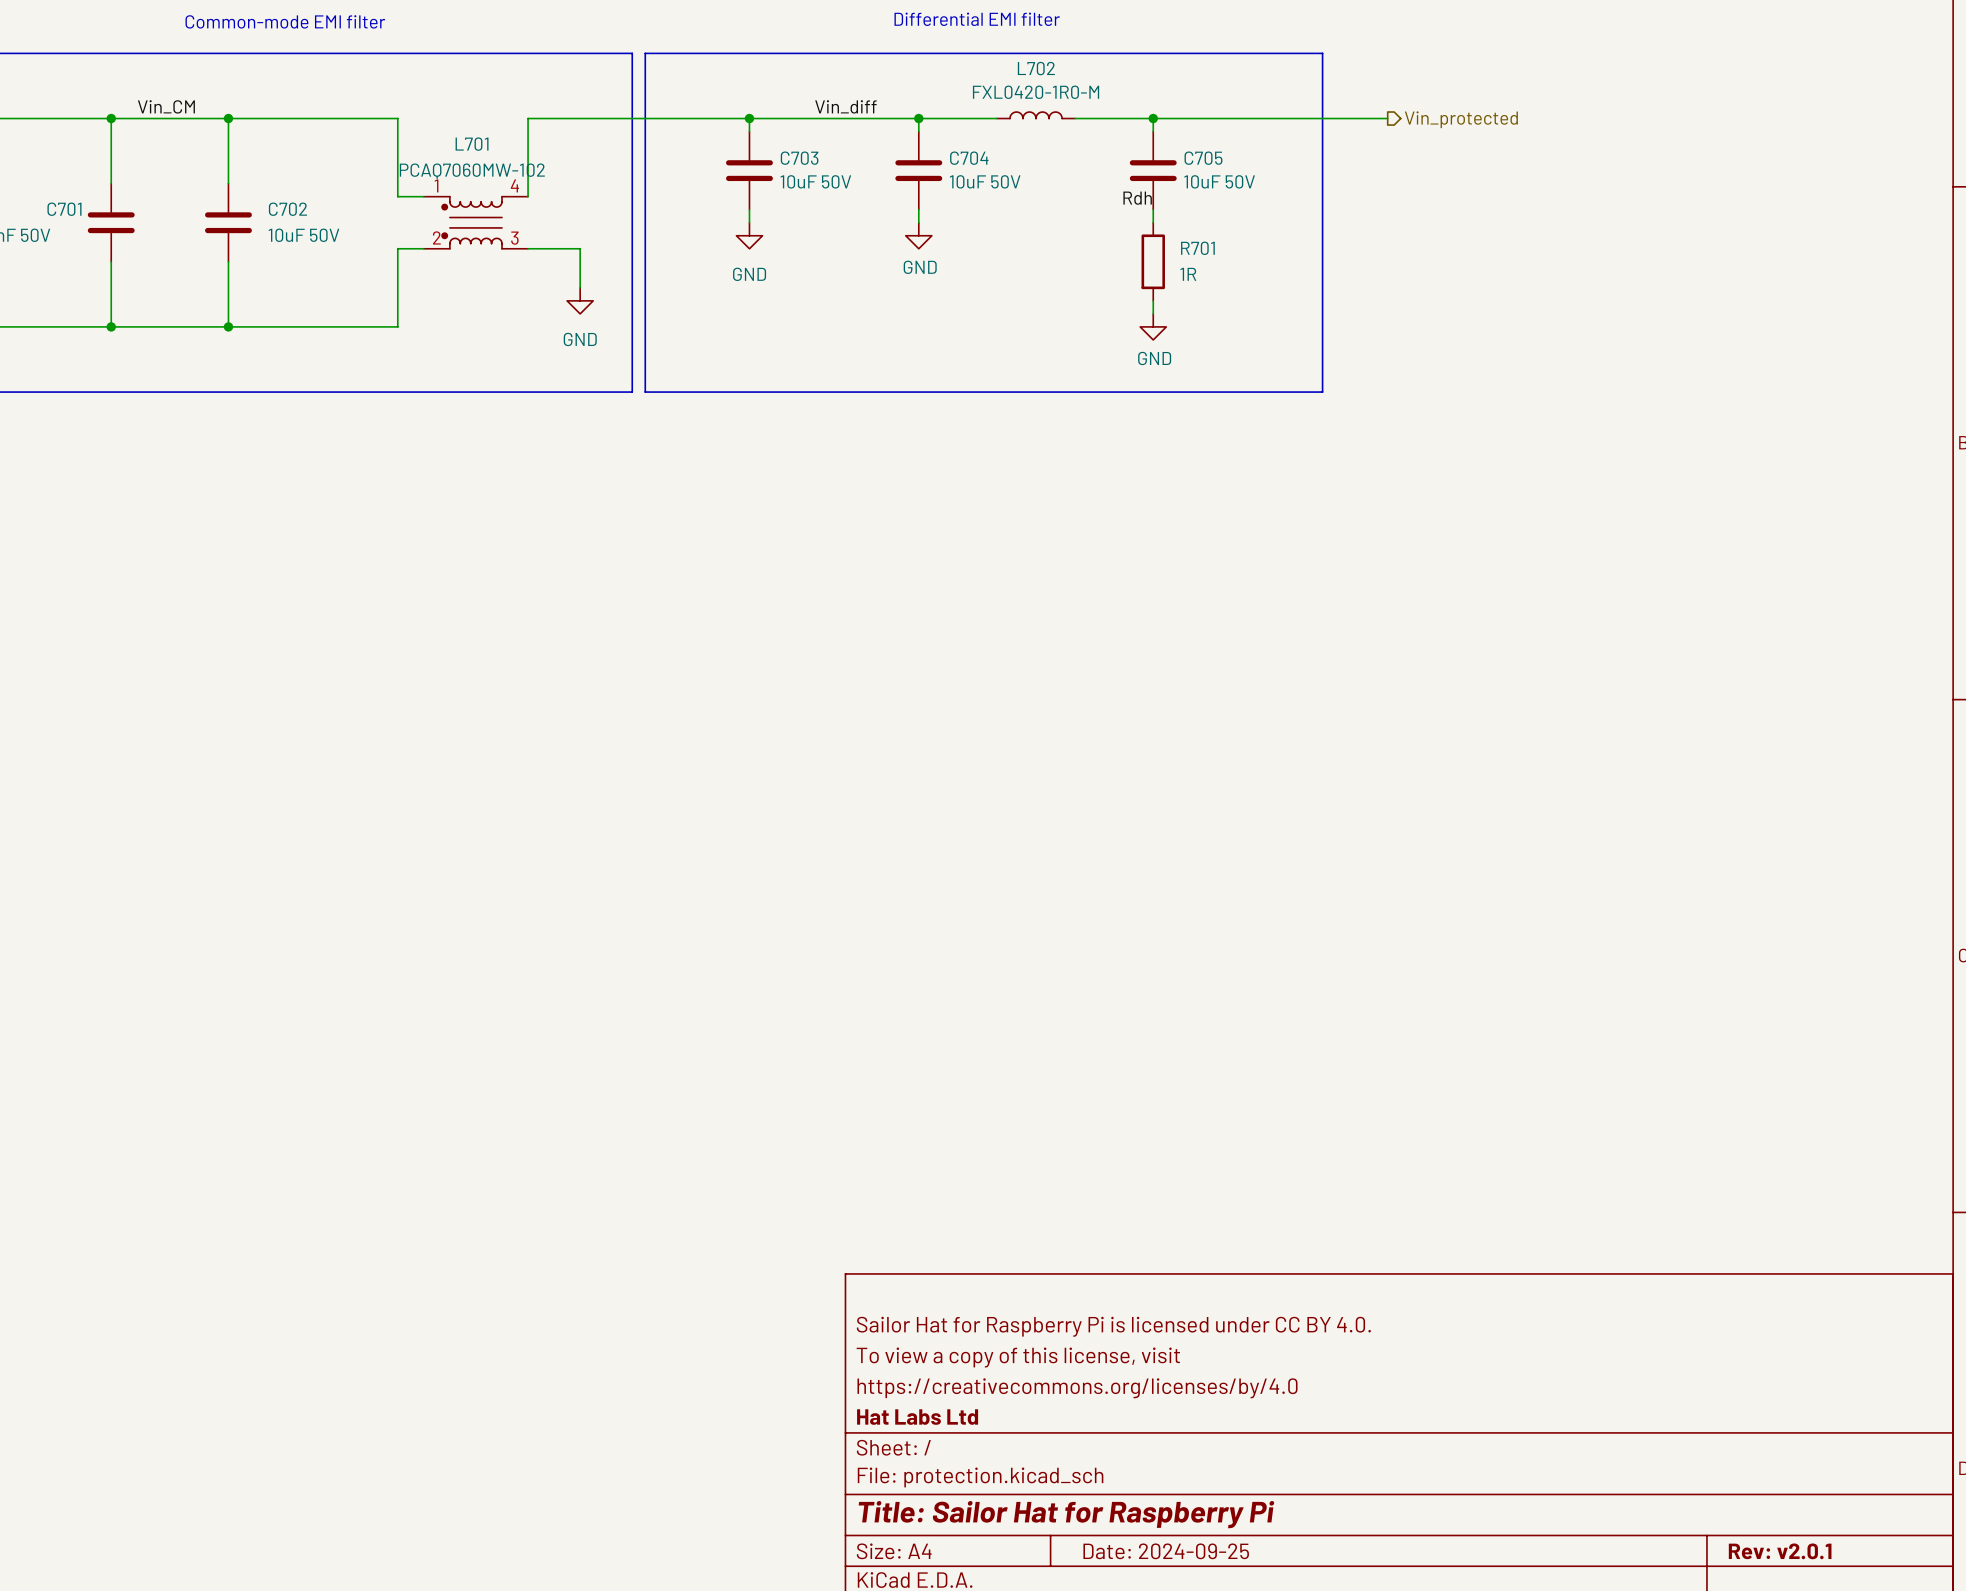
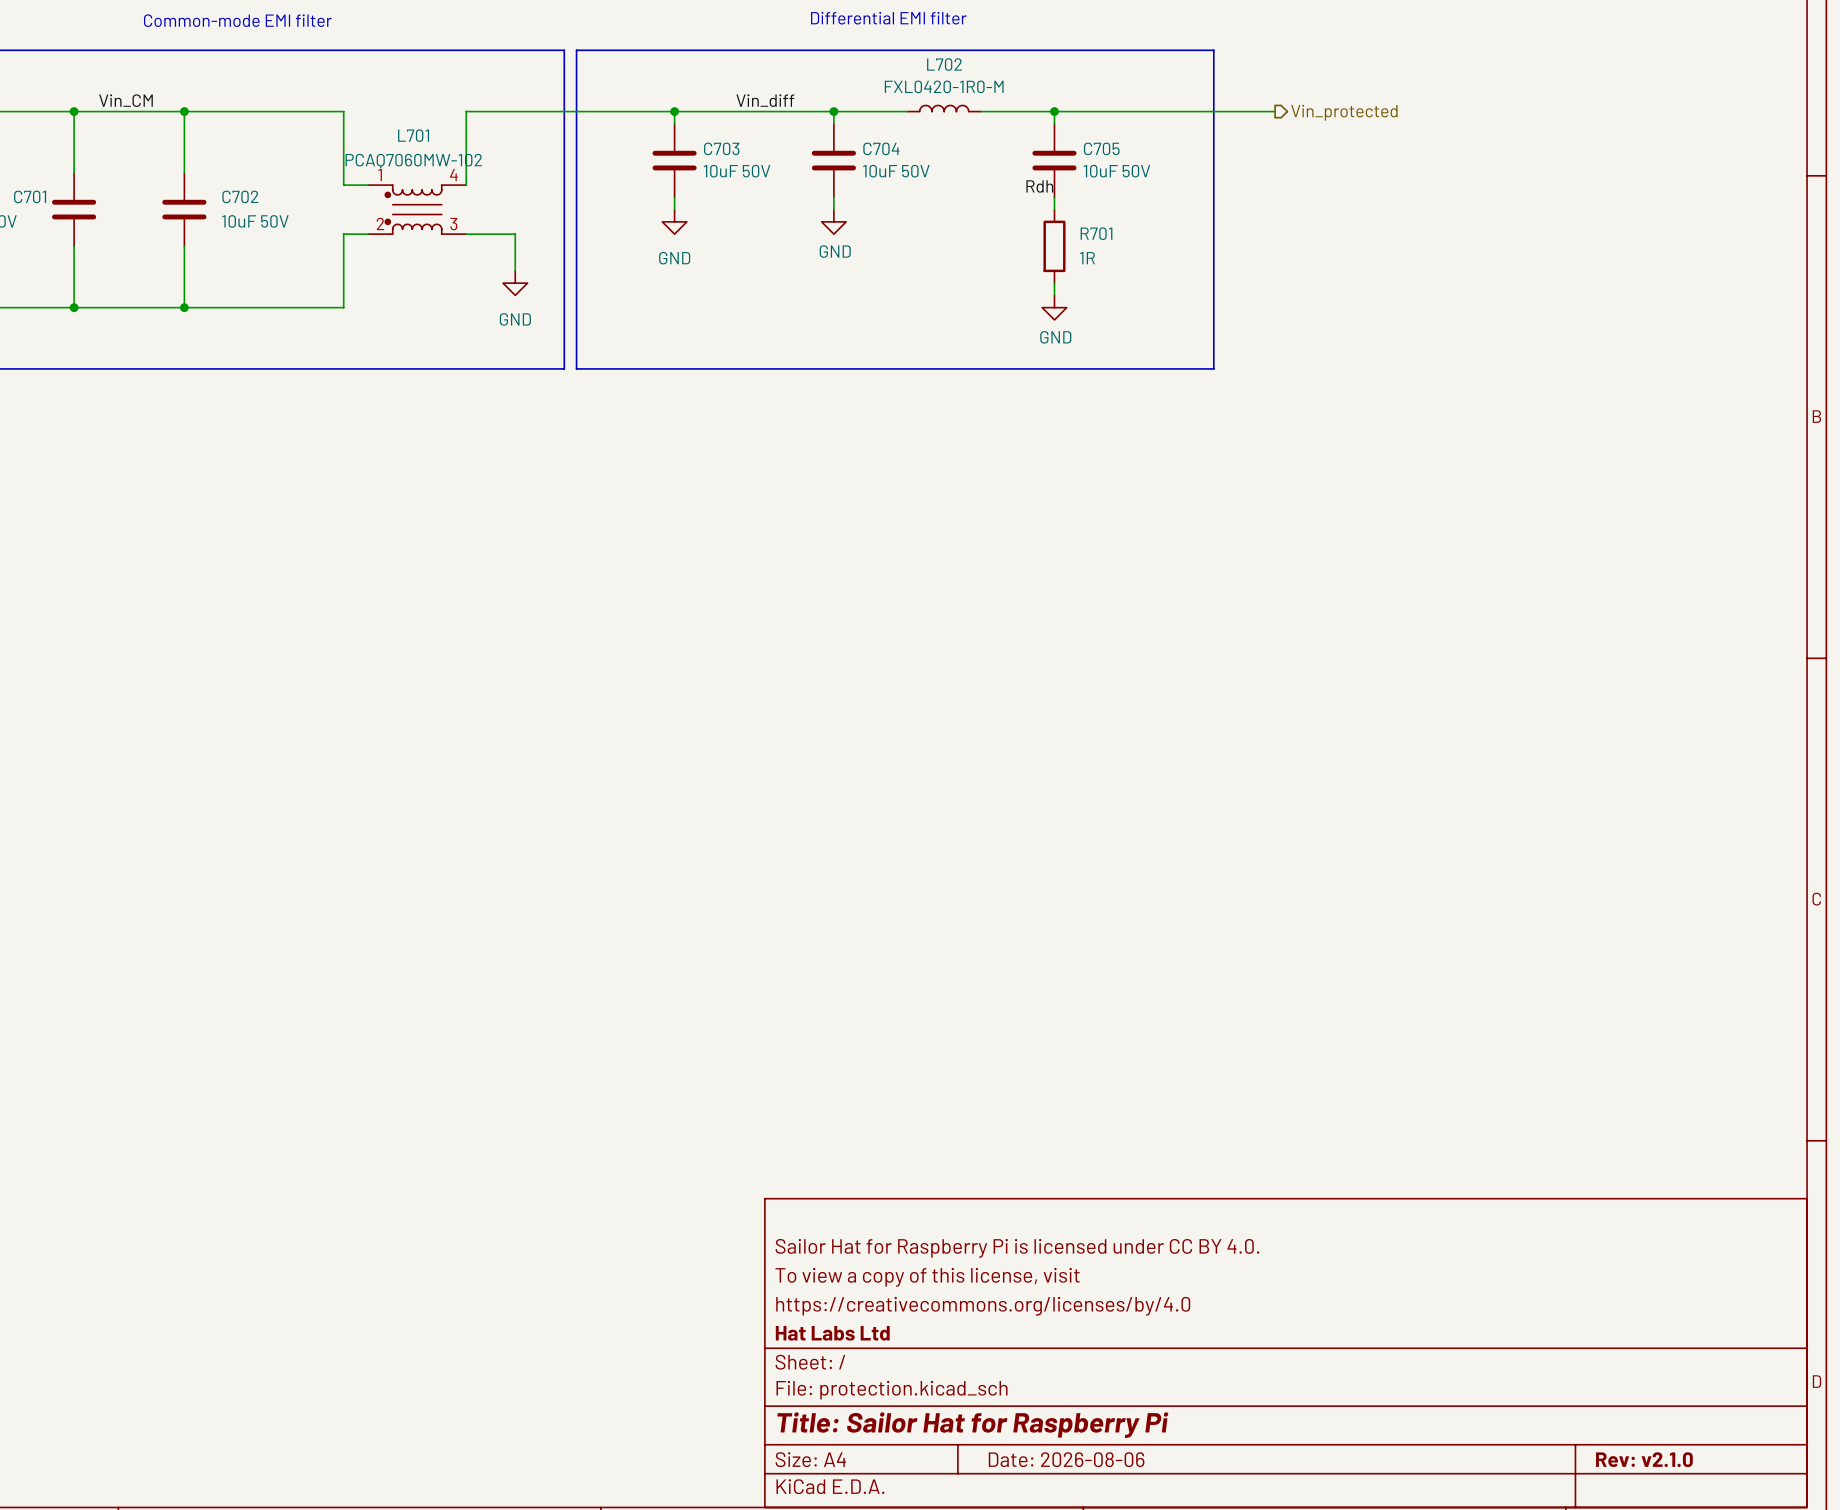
title block: Date: 2024-09-25 (1166, 1551) -> Date: 2026-08-06 (1066, 1459)
title block: Rev: v2.0.1 (1780, 1551) -> Rev: v2.1.0 (1644, 1459)

